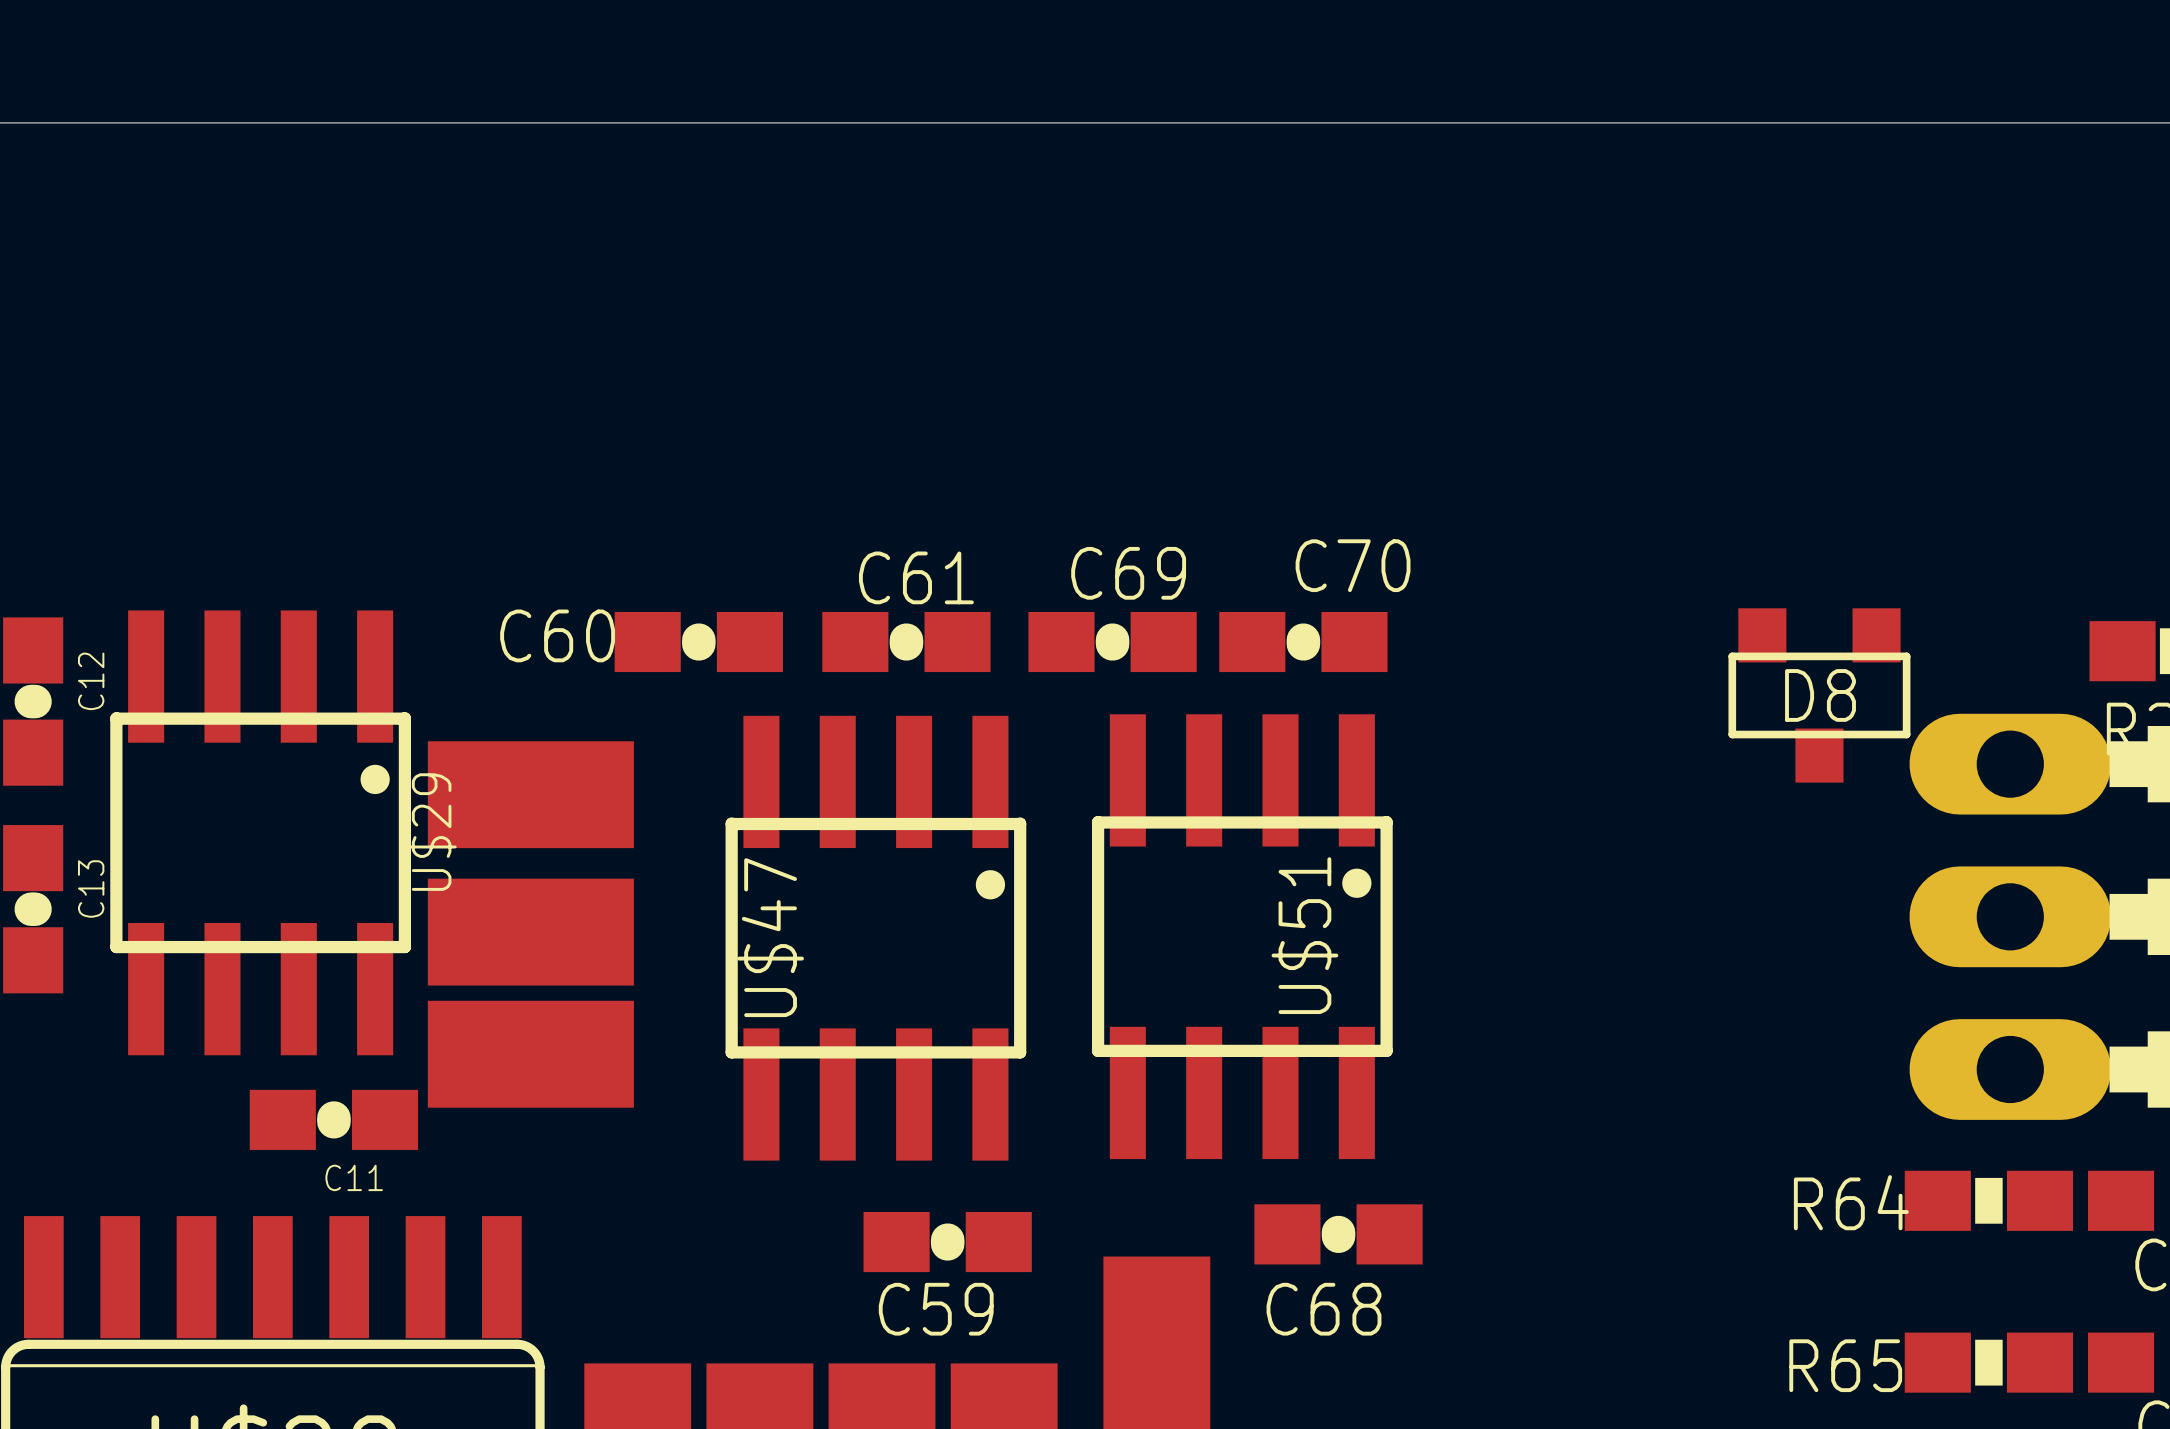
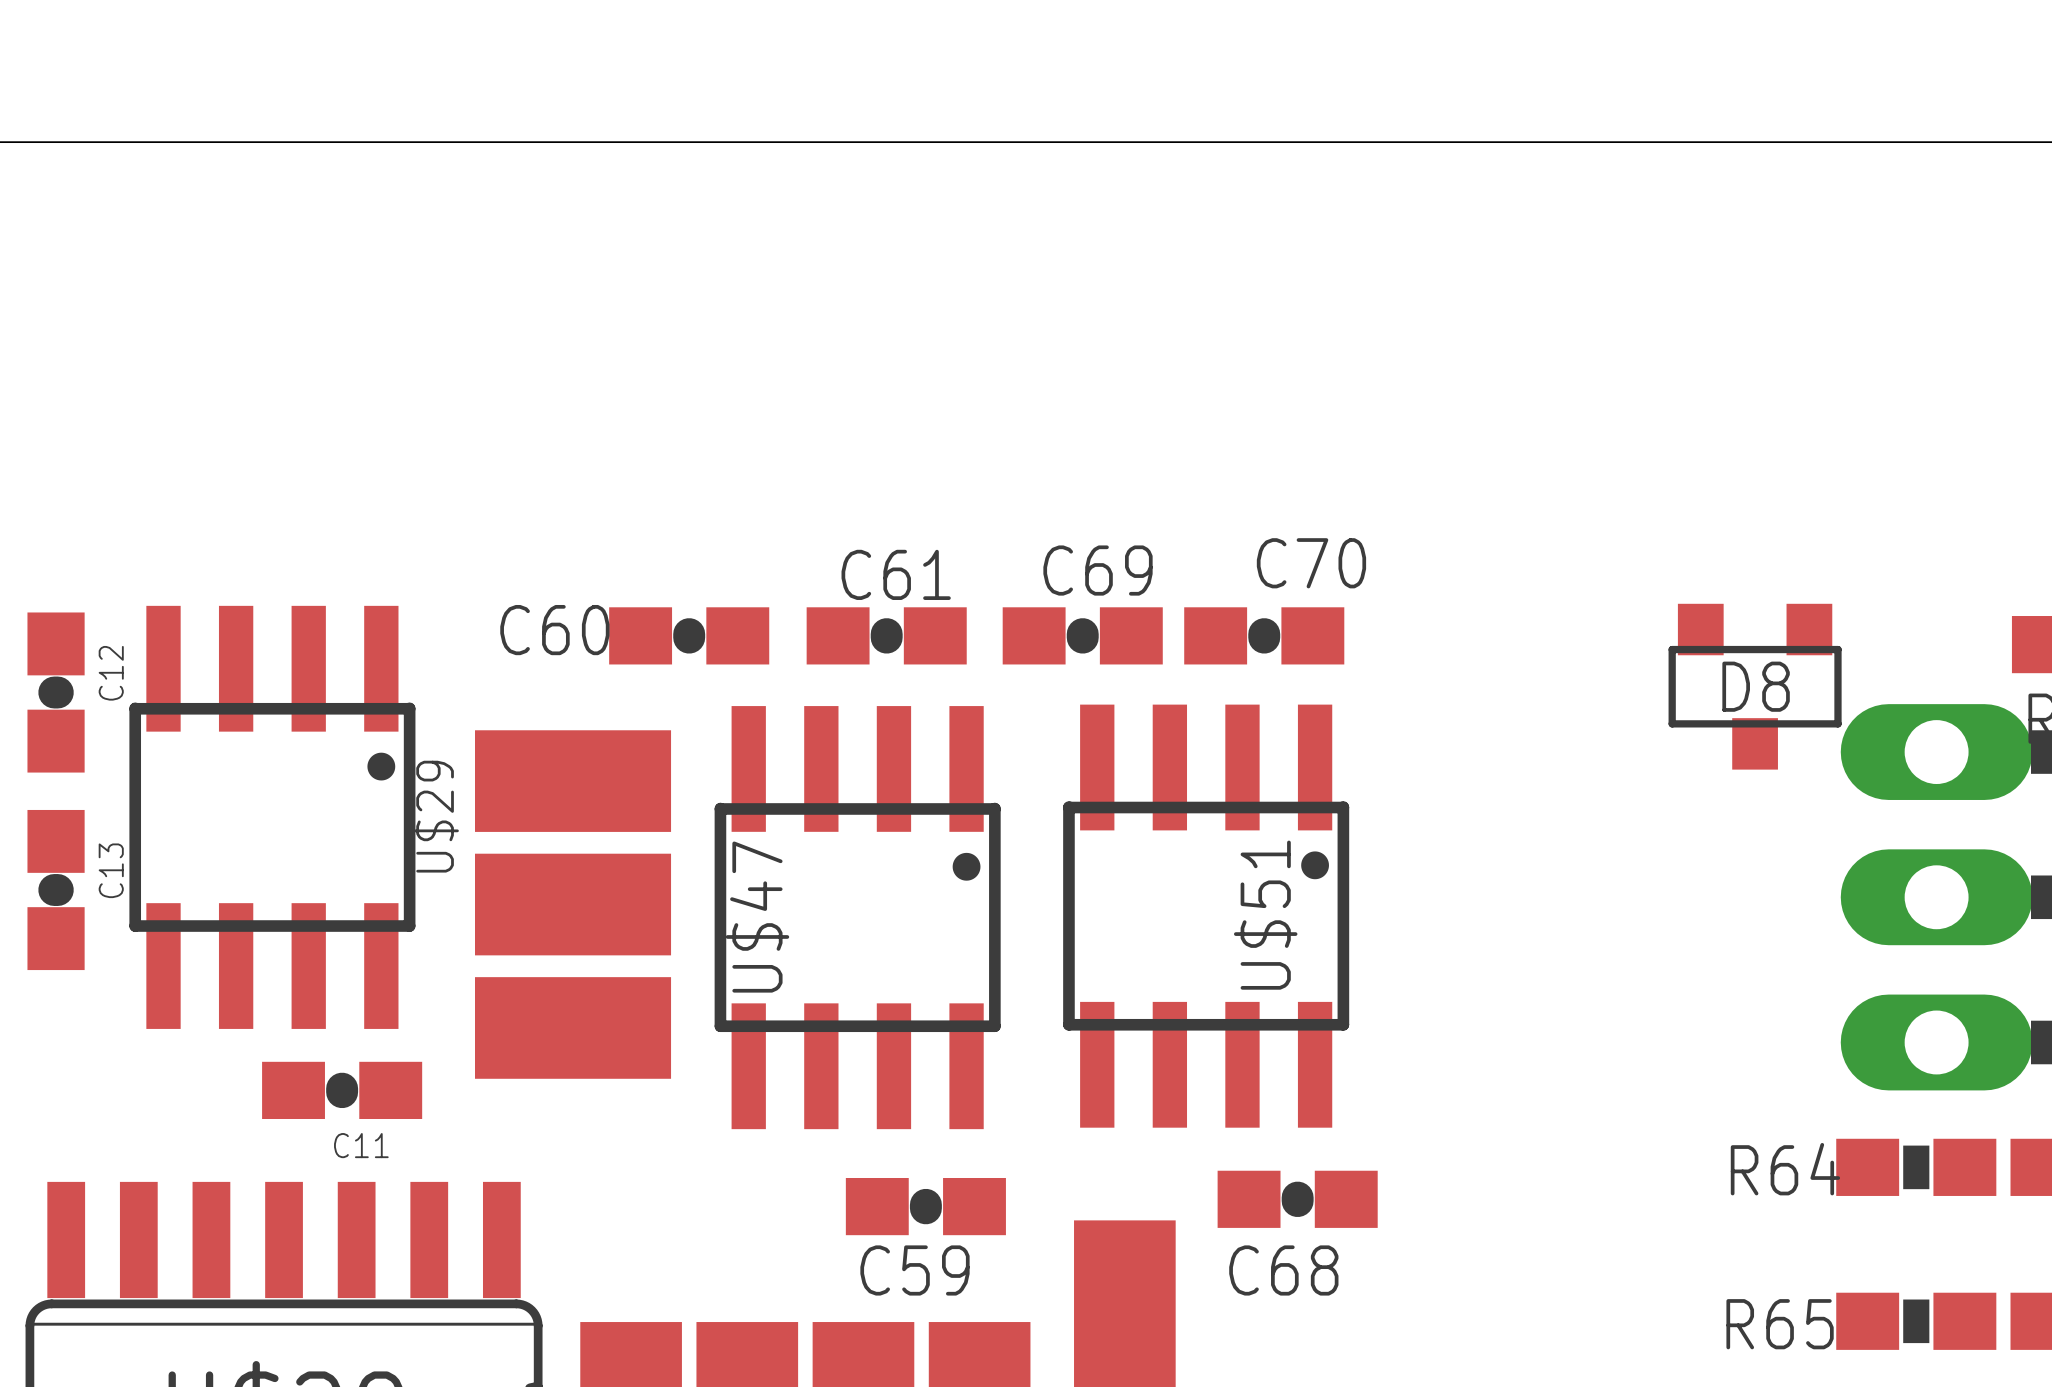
part position: (530, 794) -> (573, 781)
part position: (530, 932) -> (573, 904)
part position: (530, 1054) -> (573, 1027)

